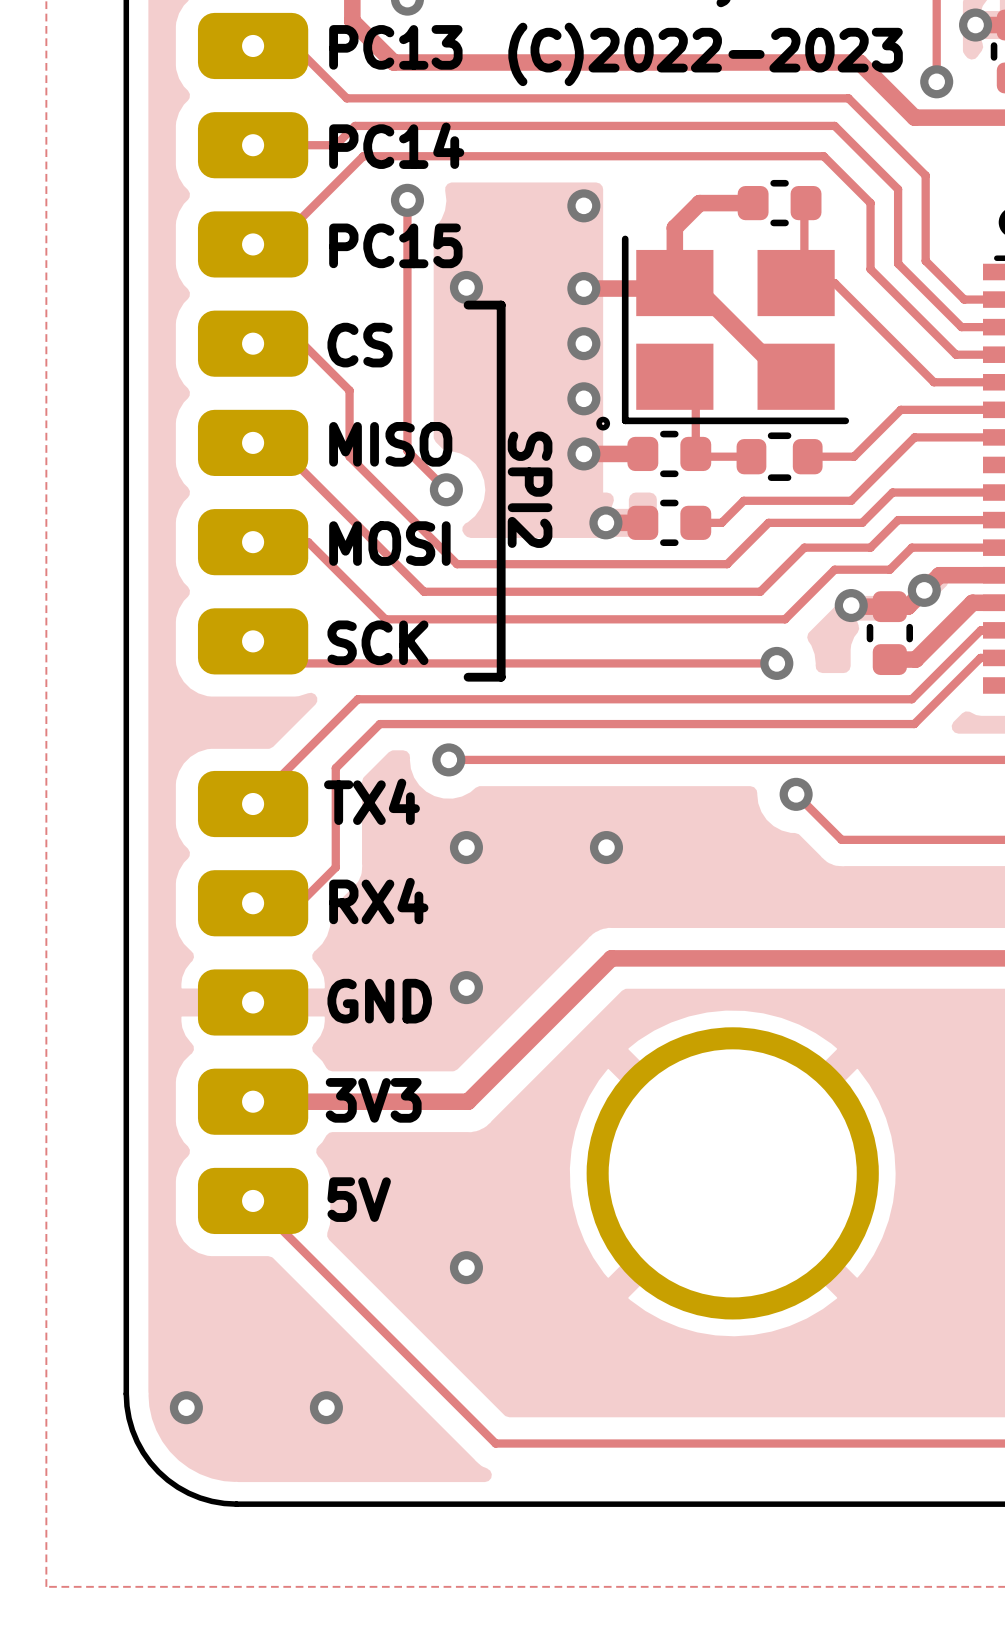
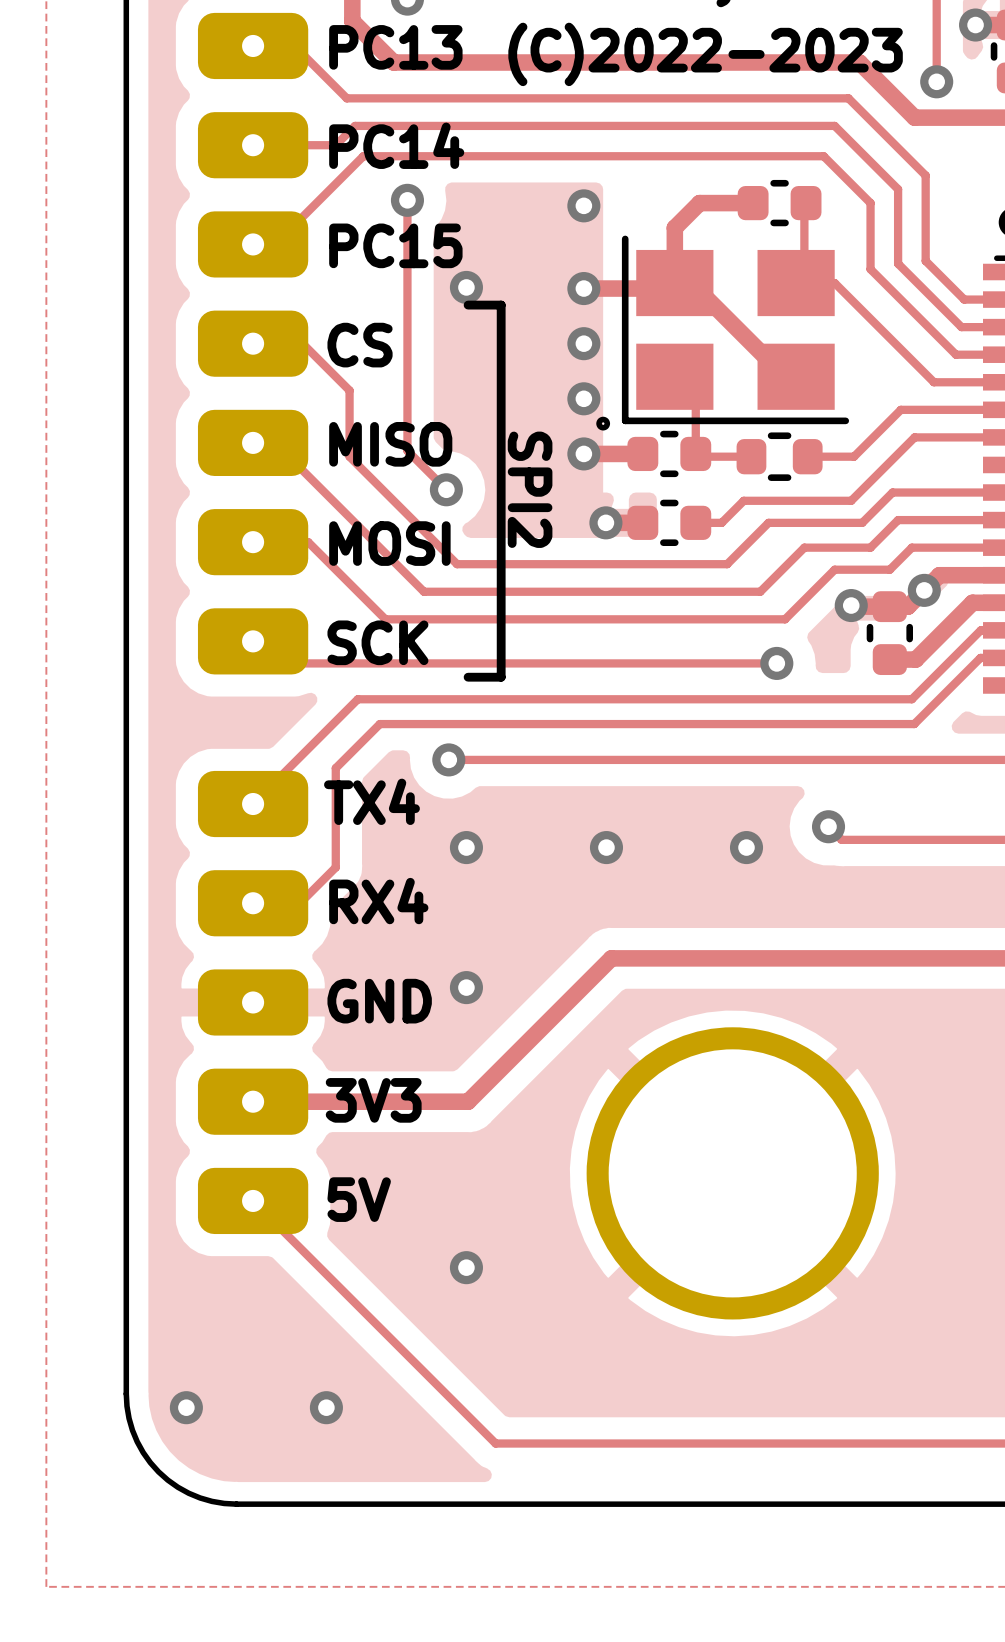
track: (796, 794) (828, 826) -> none
via position: (796, 794) -> (828, 826)
via: none -> (746, 847)

